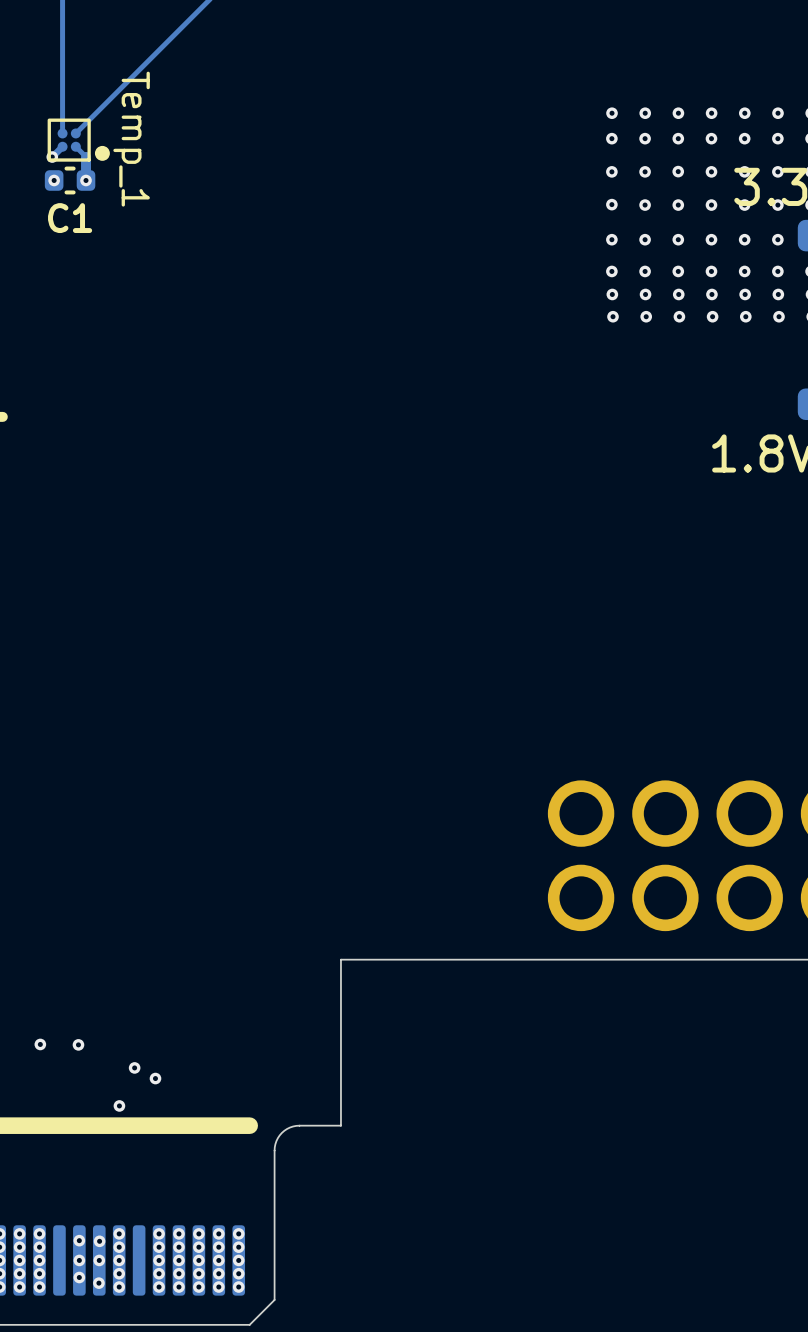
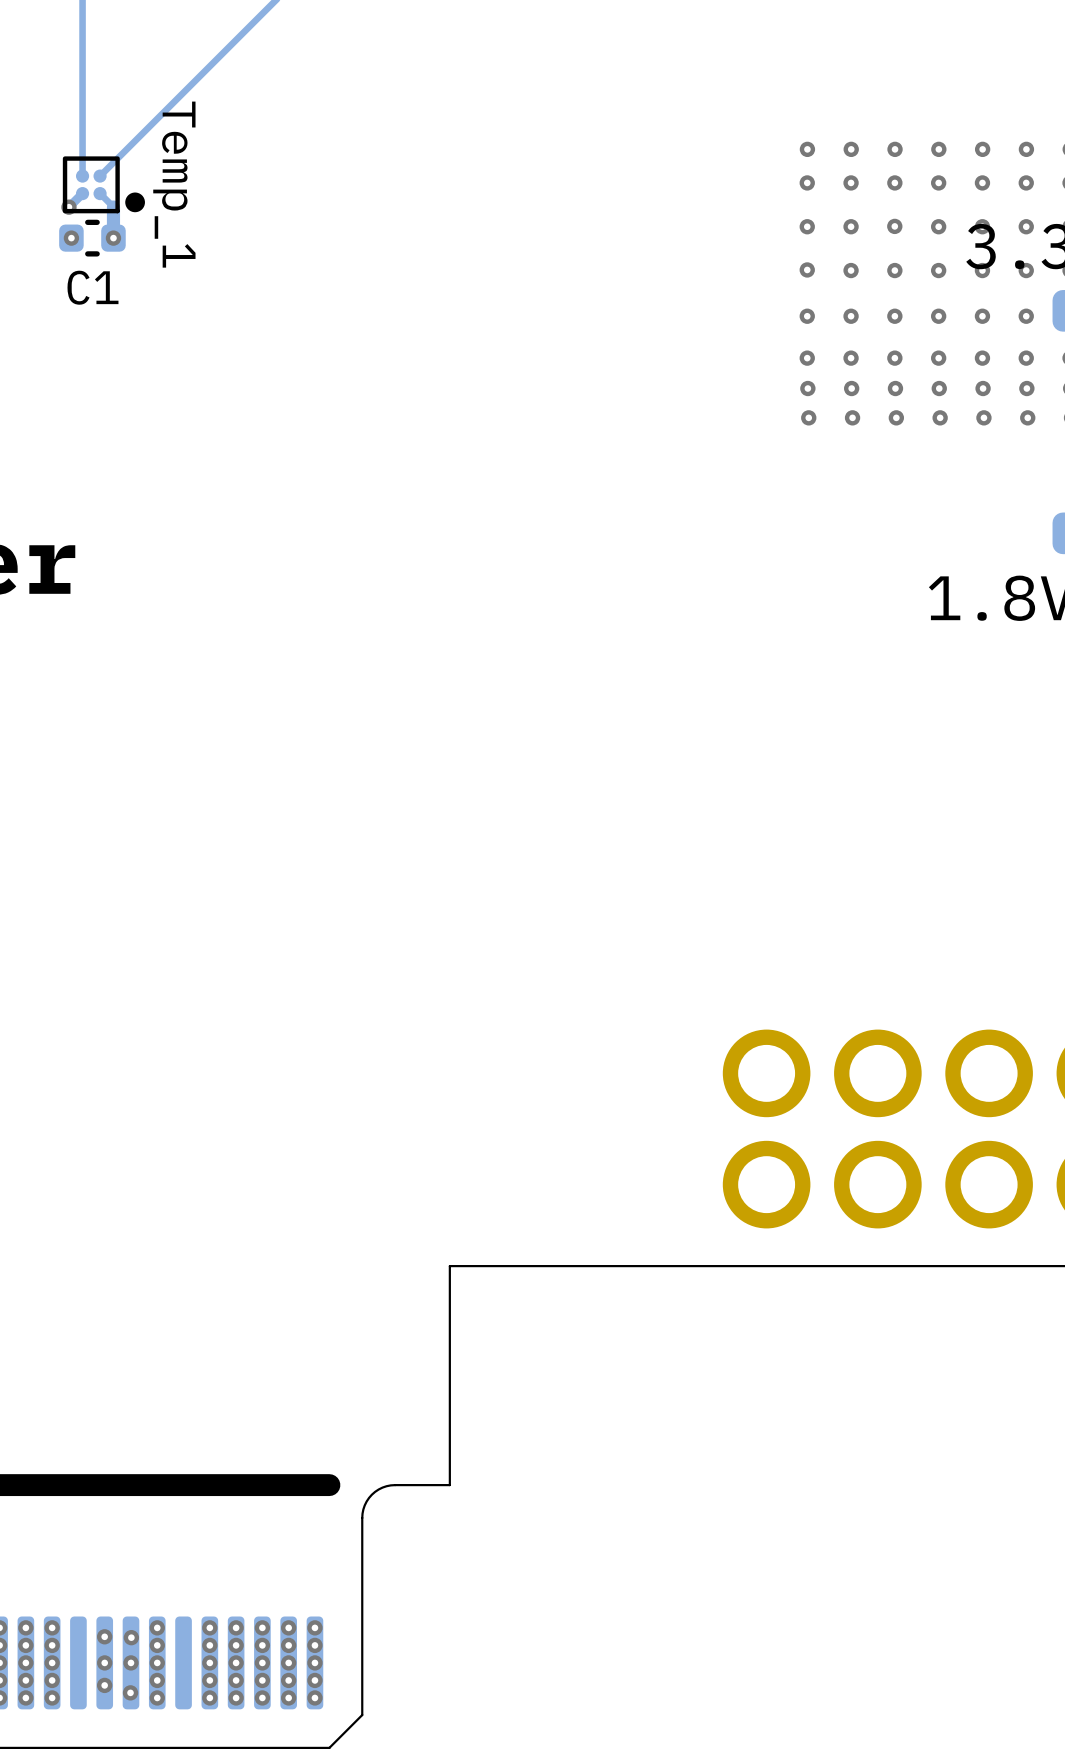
via: (40, 1044) -> none
via: (78, 1044) -> none
via: (134, 1067) -> none
via: (155, 1078) -> none
via: (119, 1105) -> none

